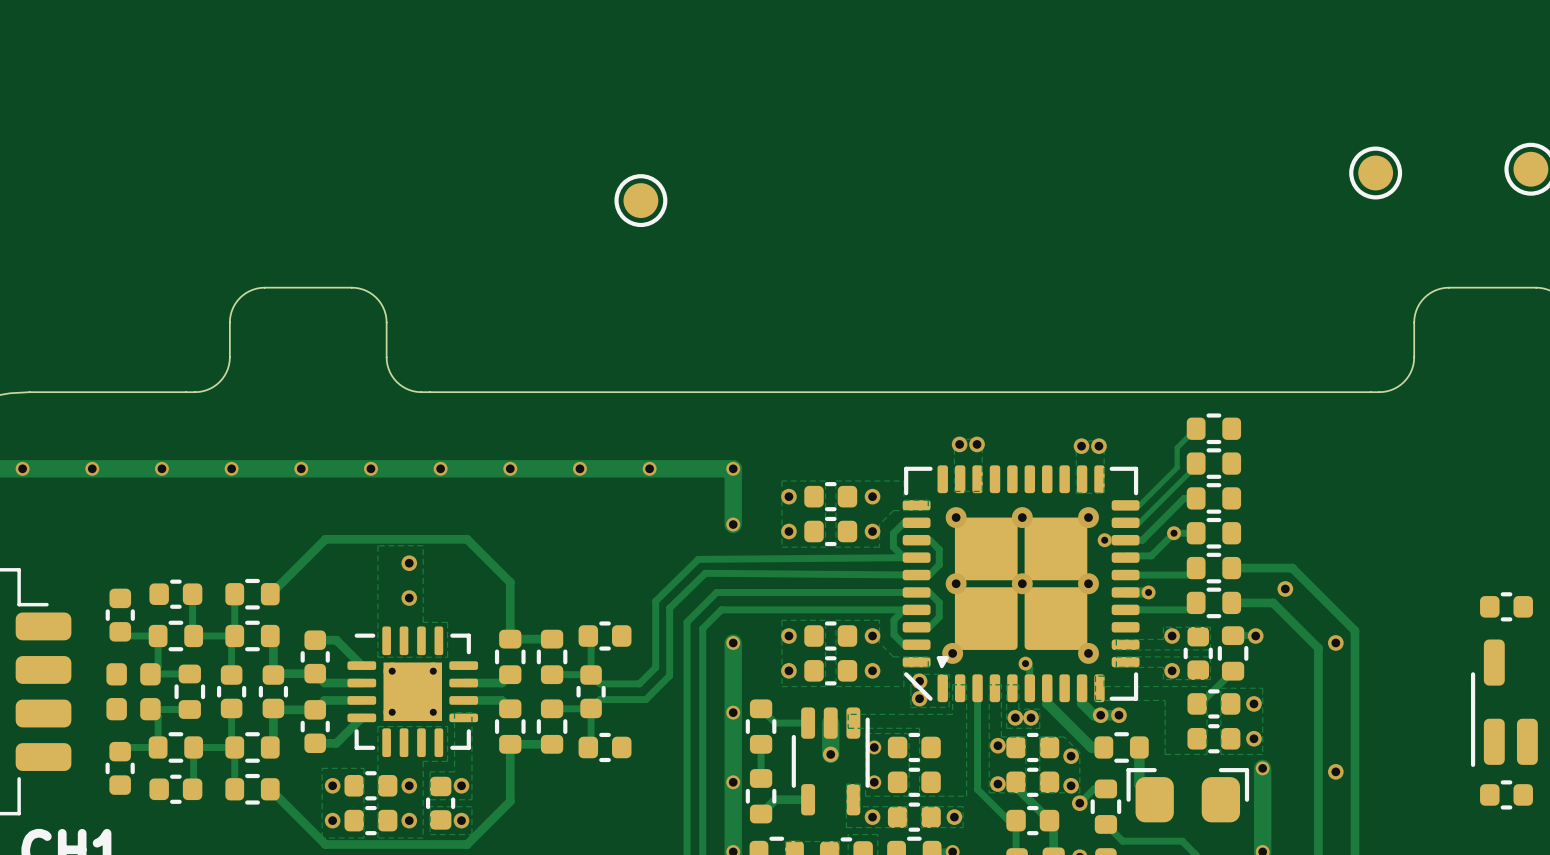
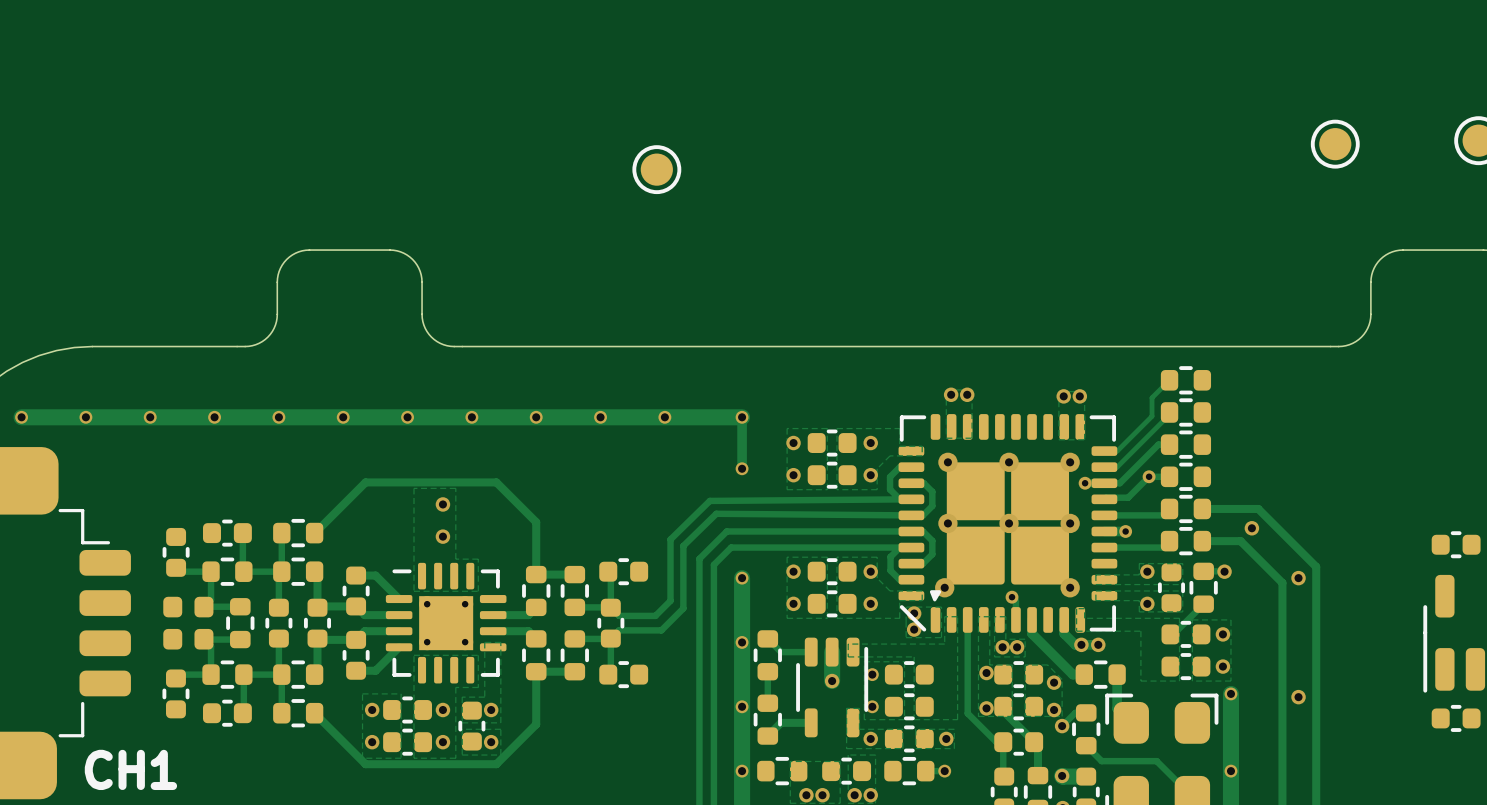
track width: thick (733, 468) (733, 524) -> thin (742, 417) (742, 468)

